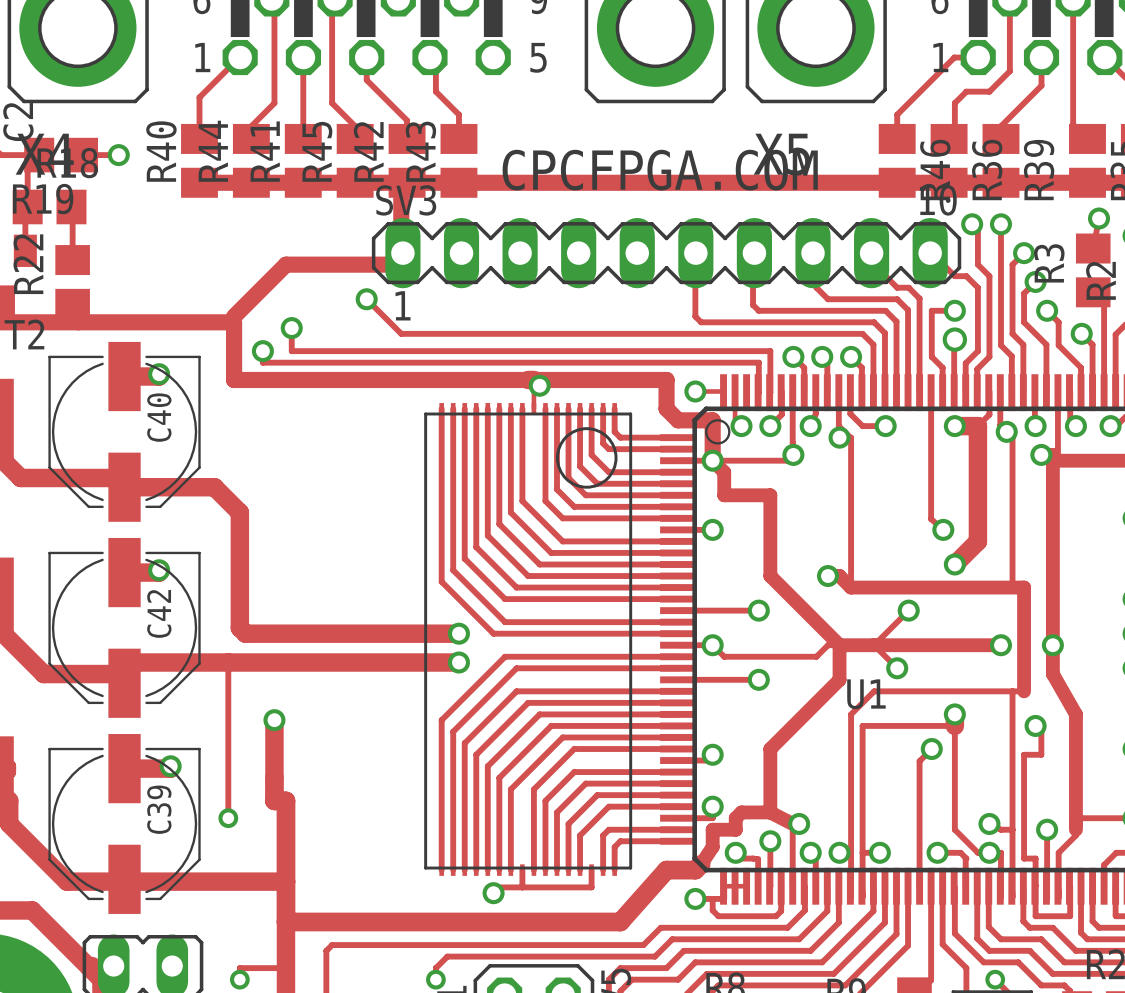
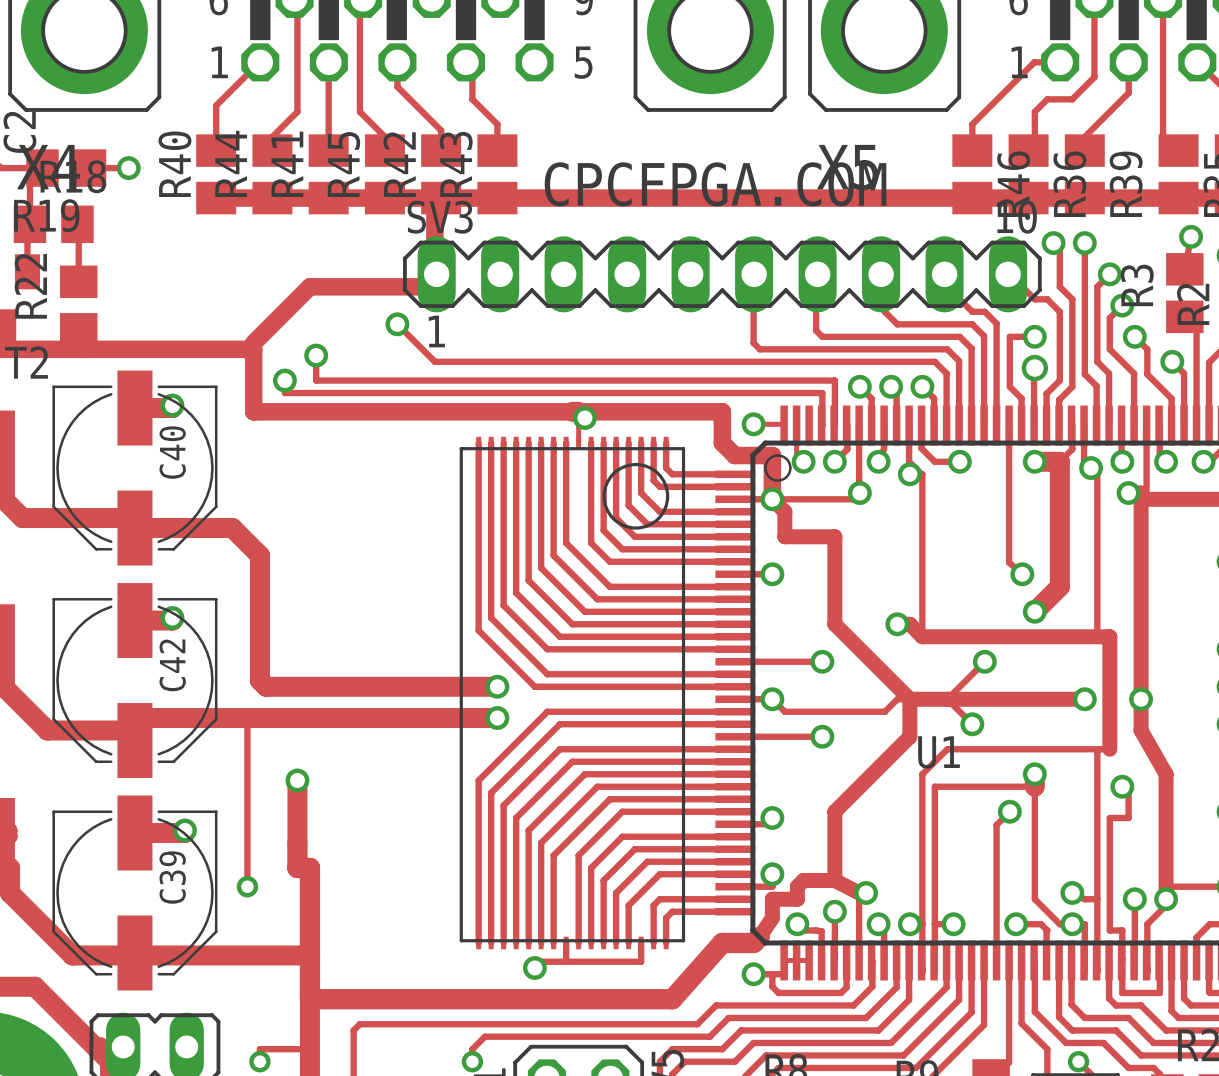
via: none -> (1166, 899)

